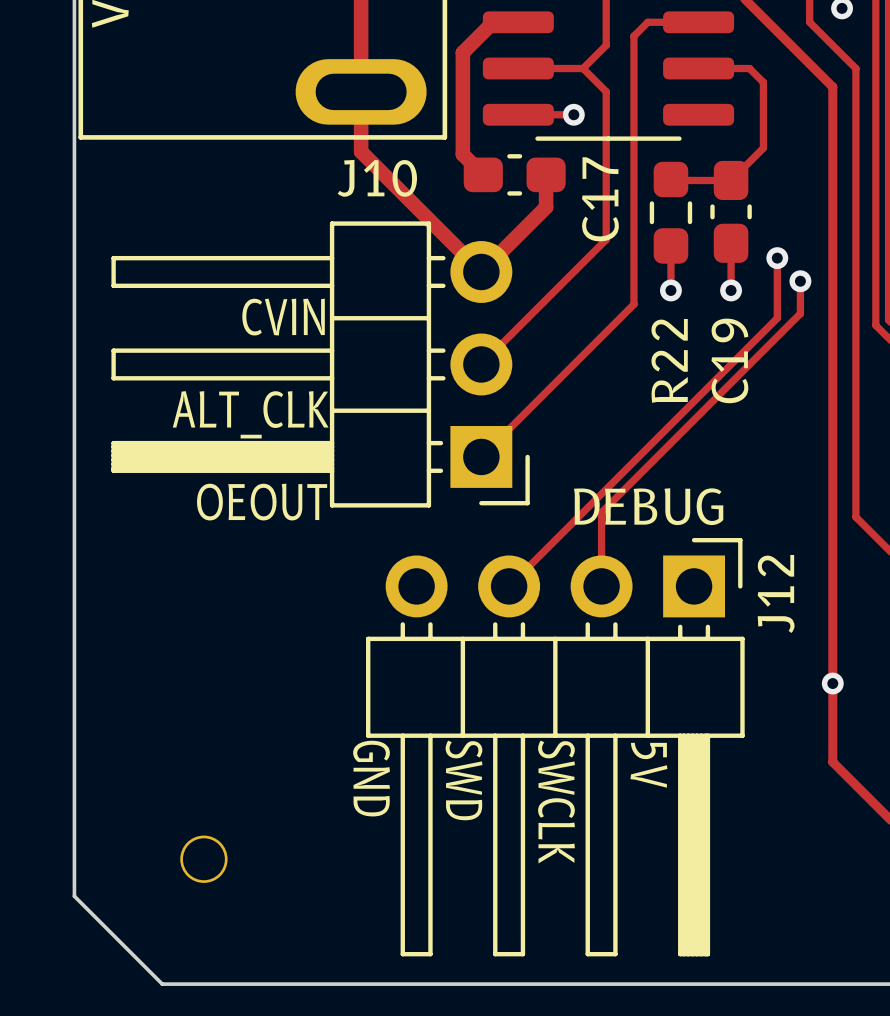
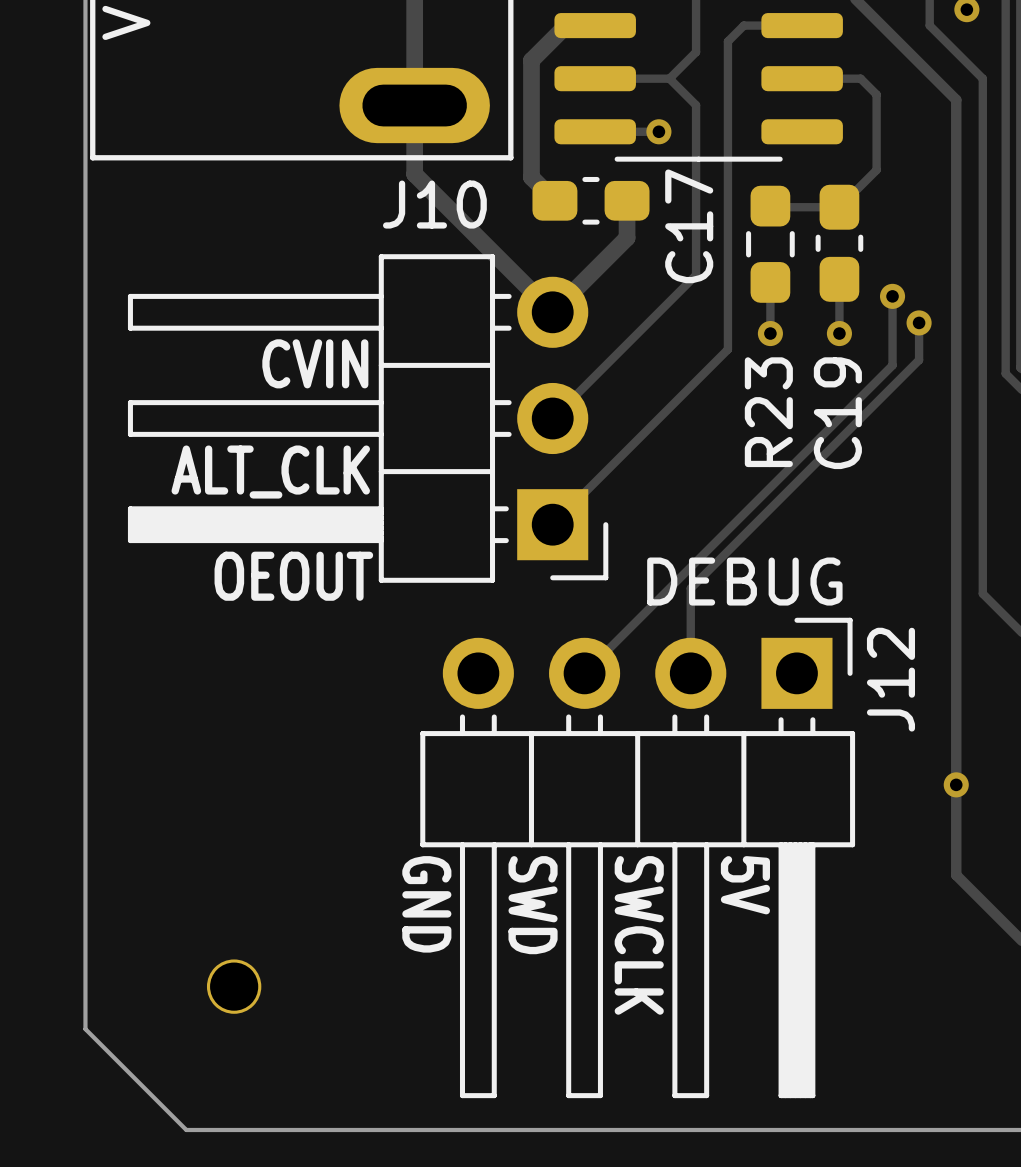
R22 name: R22 (669, 360) -> R23 (768, 412)

